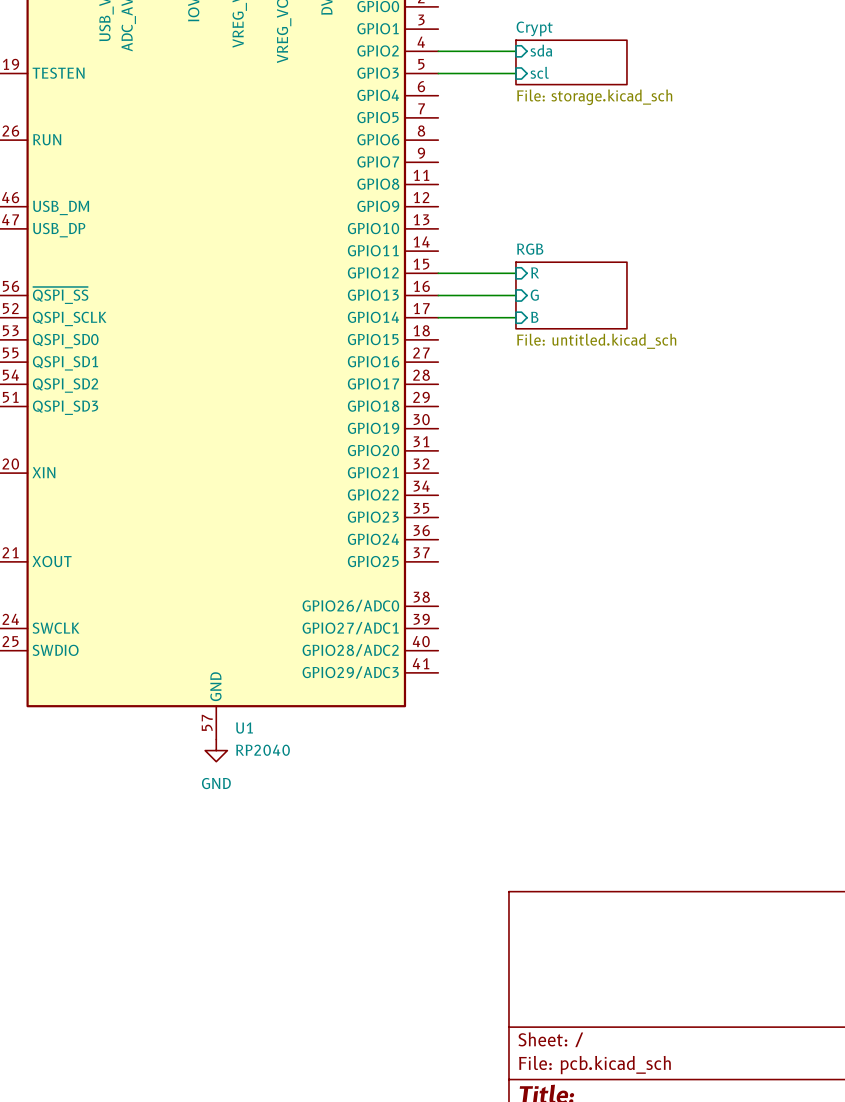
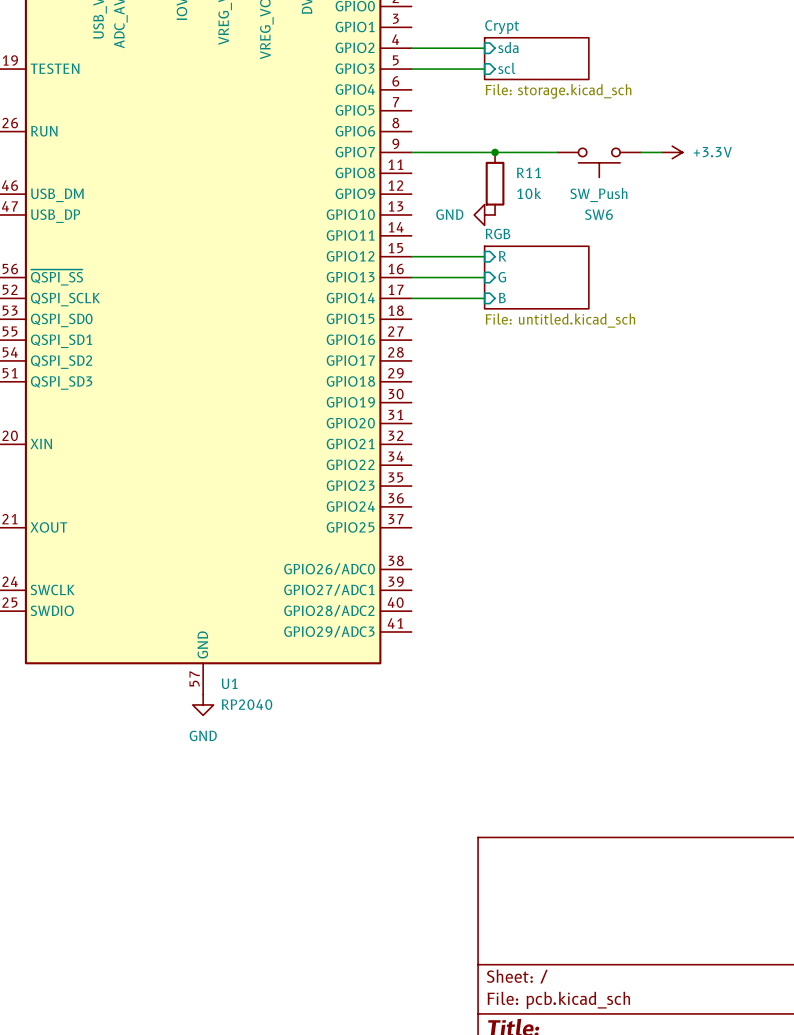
wire: none -> (411, 152) (557, 152)
junction: none -> (495, 152)
wire: none -> (640, 152) (661, 152)
power symbol: none -> +3.3V (672, 152)
SW6: none -> SW_Push (599, 162)
R11: none -> 10k (495, 183)
power symbol: none -> GND (484, 214)

